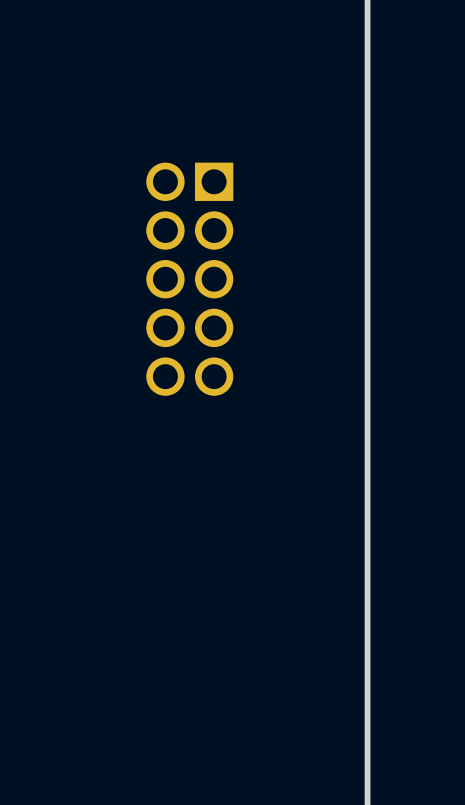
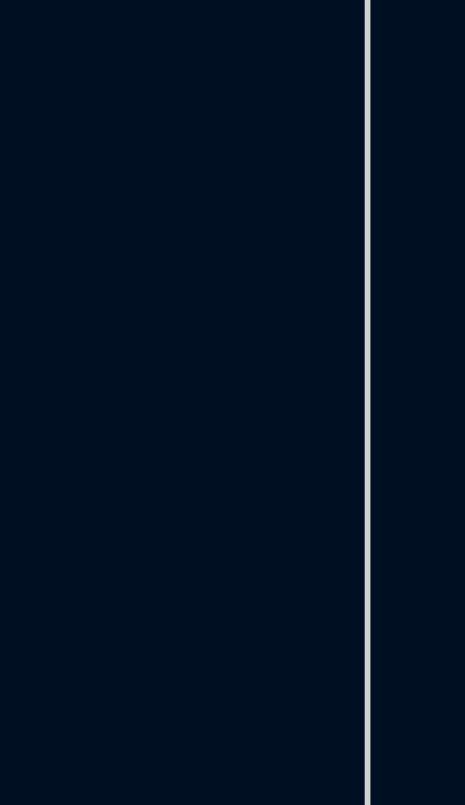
part: (189, 279) -> none

